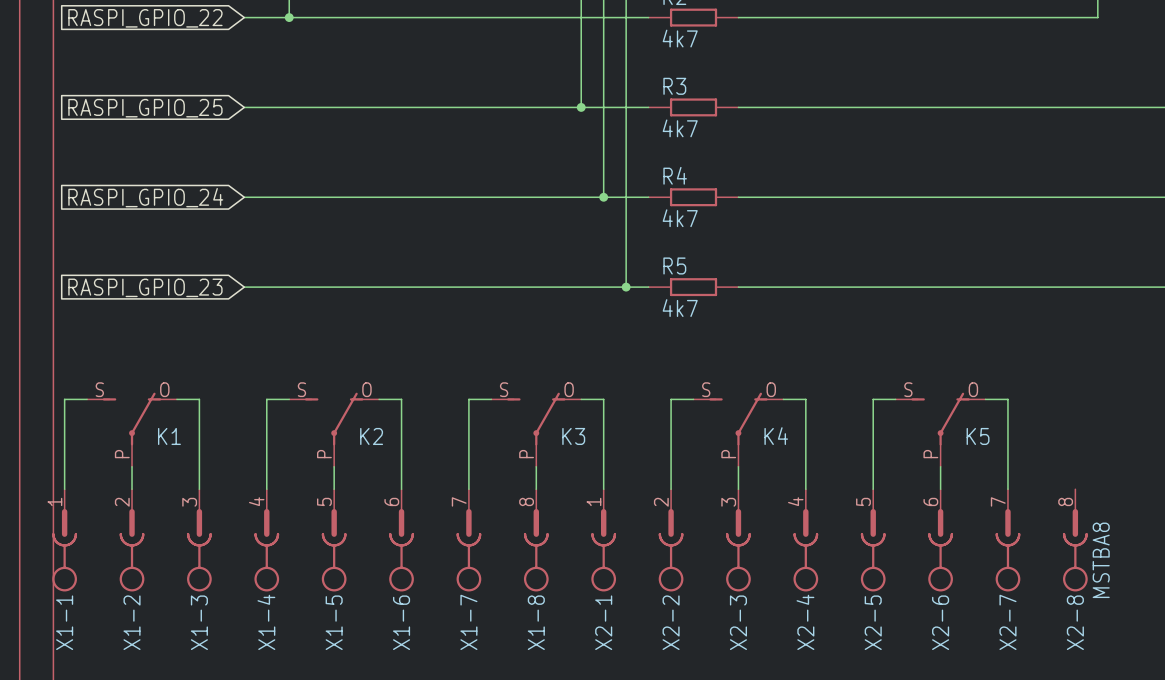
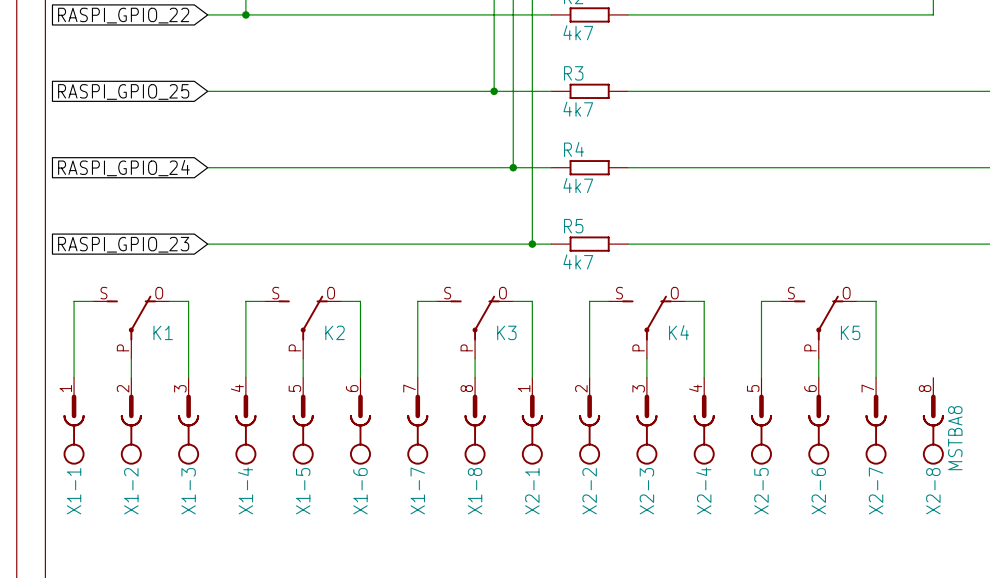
wire: (87, 399) (64, 399) (64, 489) -> (93, 301) (74, 301) (74, 377)
wire: (176, 399) (199, 399) (199, 489) -> (169, 301) (188, 301) (188, 377)
wire: (289, 399) (266, 399) (266, 489) -> (265, 301) (245, 301) (245, 377)
wire: (379, 399) (401, 399) (401, 489) -> (341, 301) (360, 301) (360, 377)
wire: (491, 399) (468, 399) (468, 489) -> (436, 301) (417, 301) (417, 377)
wire: (581, 399) (603, 399) (603, 489) -> (513, 301) (532, 301) (532, 377)
wire: (693, 399) (671, 399) (671, 489) -> (608, 301) (589, 301) (589, 377)
wire: (783, 399) (805, 399) (805, 489) -> (685, 301) (704, 301) (704, 377)
wire: (895, 399) (873, 399) (873, 489) -> (780, 301) (761, 301) (761, 377)
wire: (985, 399) (1007, 399) (1007, 489) -> (856, 301) (876, 301) (876, 377)
K1 position: (132, 429) -> (131, 327)
K2 position: (334, 429) -> (303, 327)
K3 position: (536, 429) -> (475, 327)
K4 position: (738, 429) -> (646, 327)
K5 position: (940, 429) -> (818, 327)
wire: (132, 466) (132, 489) -> (131, 358) (131, 377)
wire: (334, 466) (334, 489) -> (303, 358) (303, 377)
wire: (536, 466) (536, 489) -> (475, 358) (475, 377)
wire: (738, 466) (738, 489) -> (646, 358) (646, 377)
wire: (940, 466) (940, 489) -> (818, 358) (818, 377)
X1-1 position: (64, 540) -> (74, 421)
X1-2 position: (132, 540) -> (131, 421)
X1-3 position: (199, 540) -> (188, 421)
X1-4 position: (266, 540) -> (245, 421)
X1-5 position: (334, 540) -> (303, 421)
X1-6 position: (401, 540) -> (360, 421)
X1-7 position: (468, 540) -> (417, 421)
X1-8 position: (536, 540) -> (475, 421)
X2-1 position: (603, 540) -> (532, 421)
X2-2 position: (671, 540) -> (589, 421)
X2-3 position: (738, 540) -> (646, 421)
X2-4 position: (805, 540) -> (704, 421)
X2-5 position: (873, 540) -> (761, 421)
X2-6 position: (940, 540) -> (818, 421)
X2-7 position: (1007, 540) -> (876, 421)
X2-8 position: (1075, 540) -> (933, 421)

